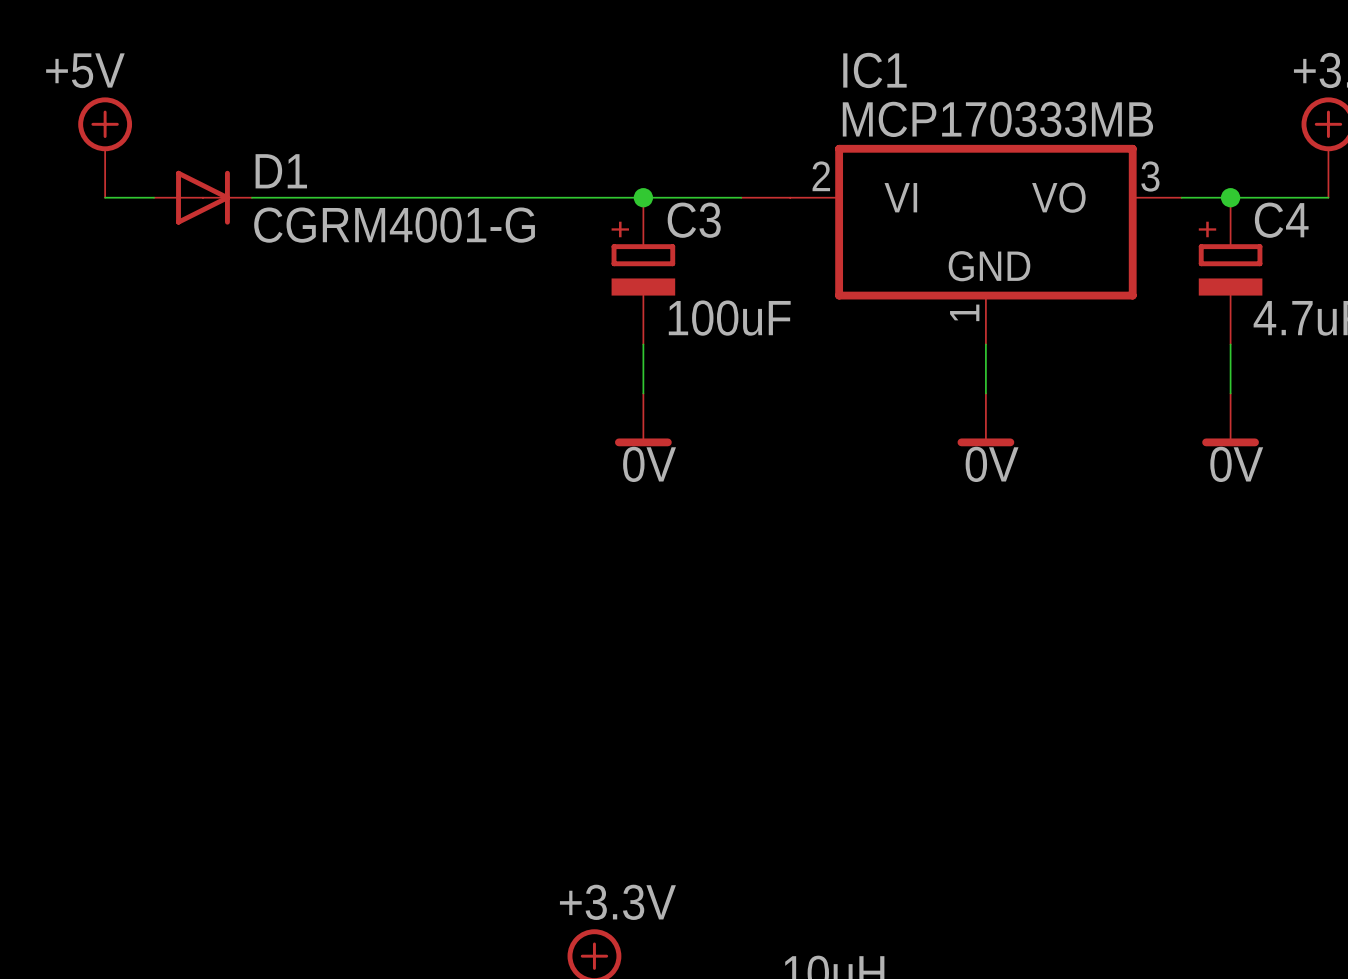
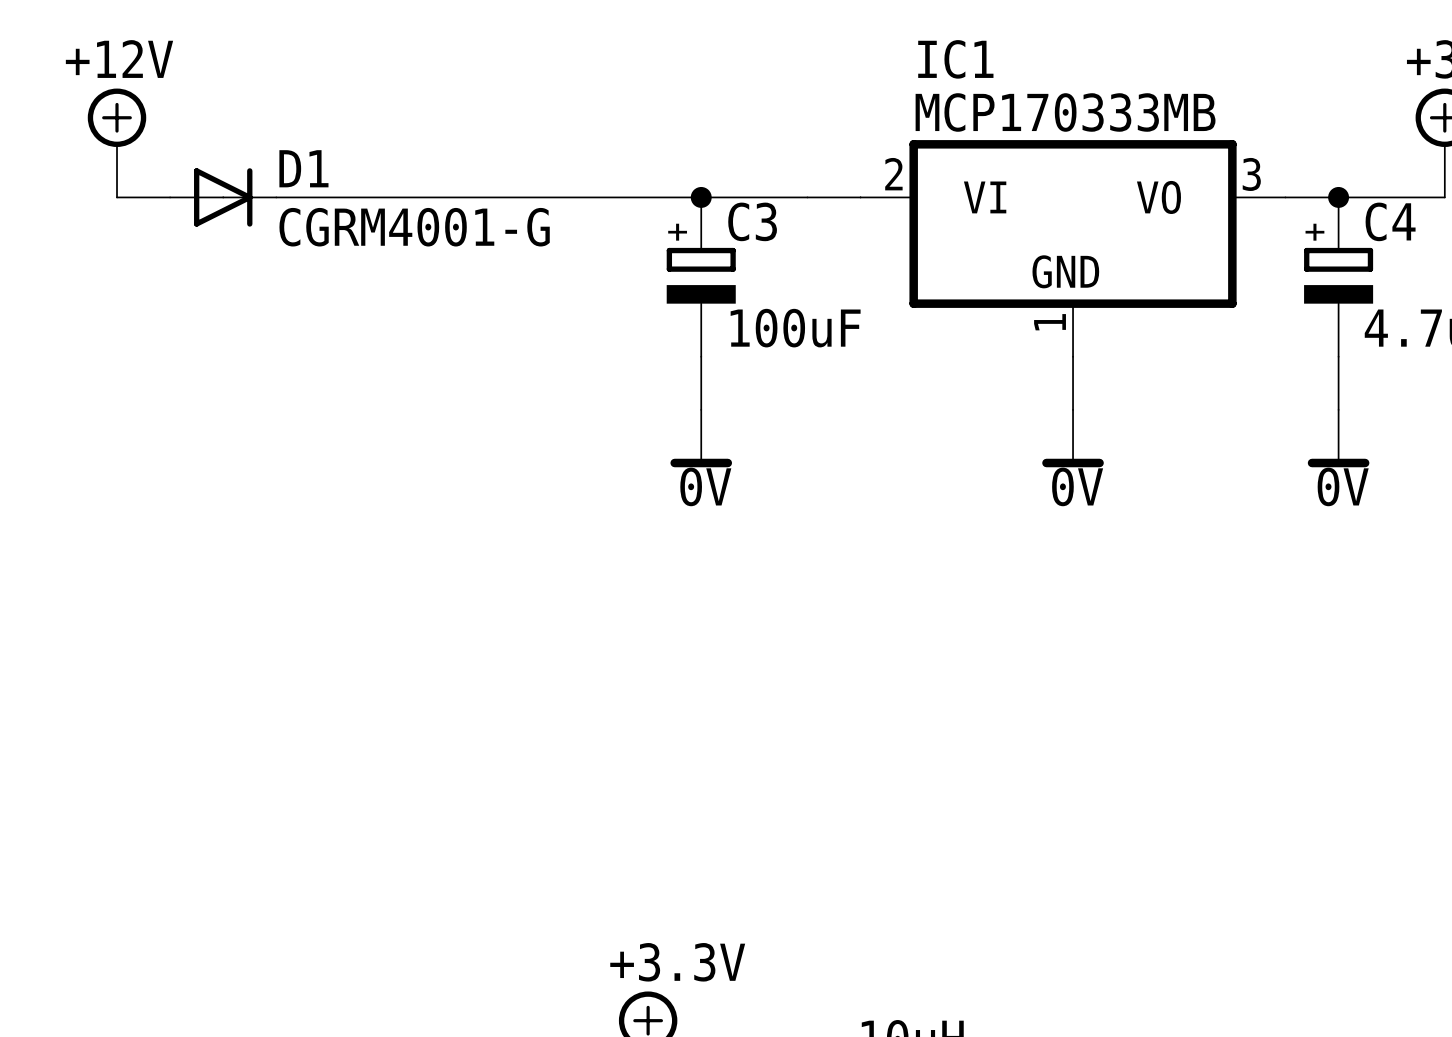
power symbol: +5V (105, 147) -> +12V (117, 143)

